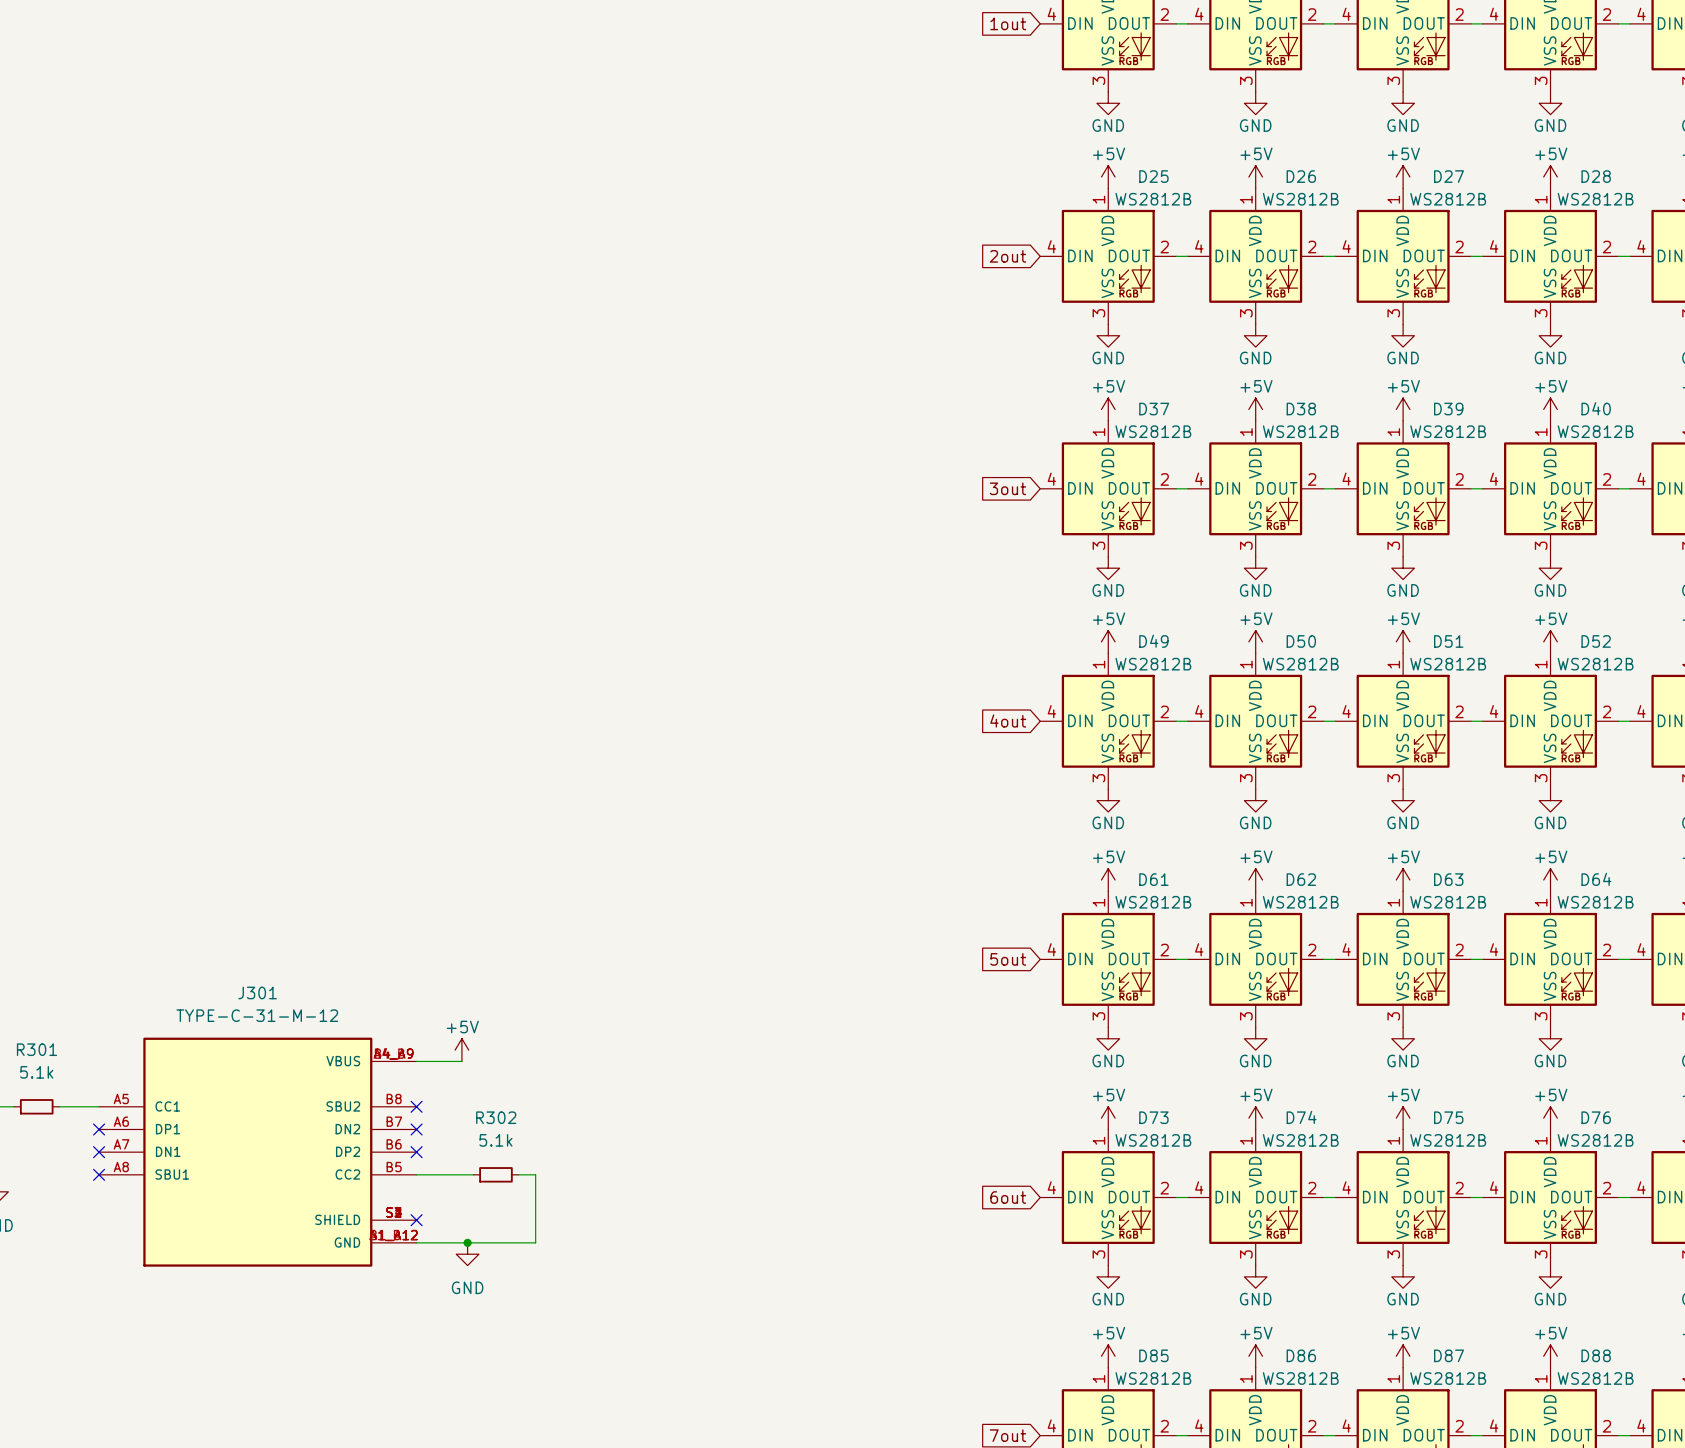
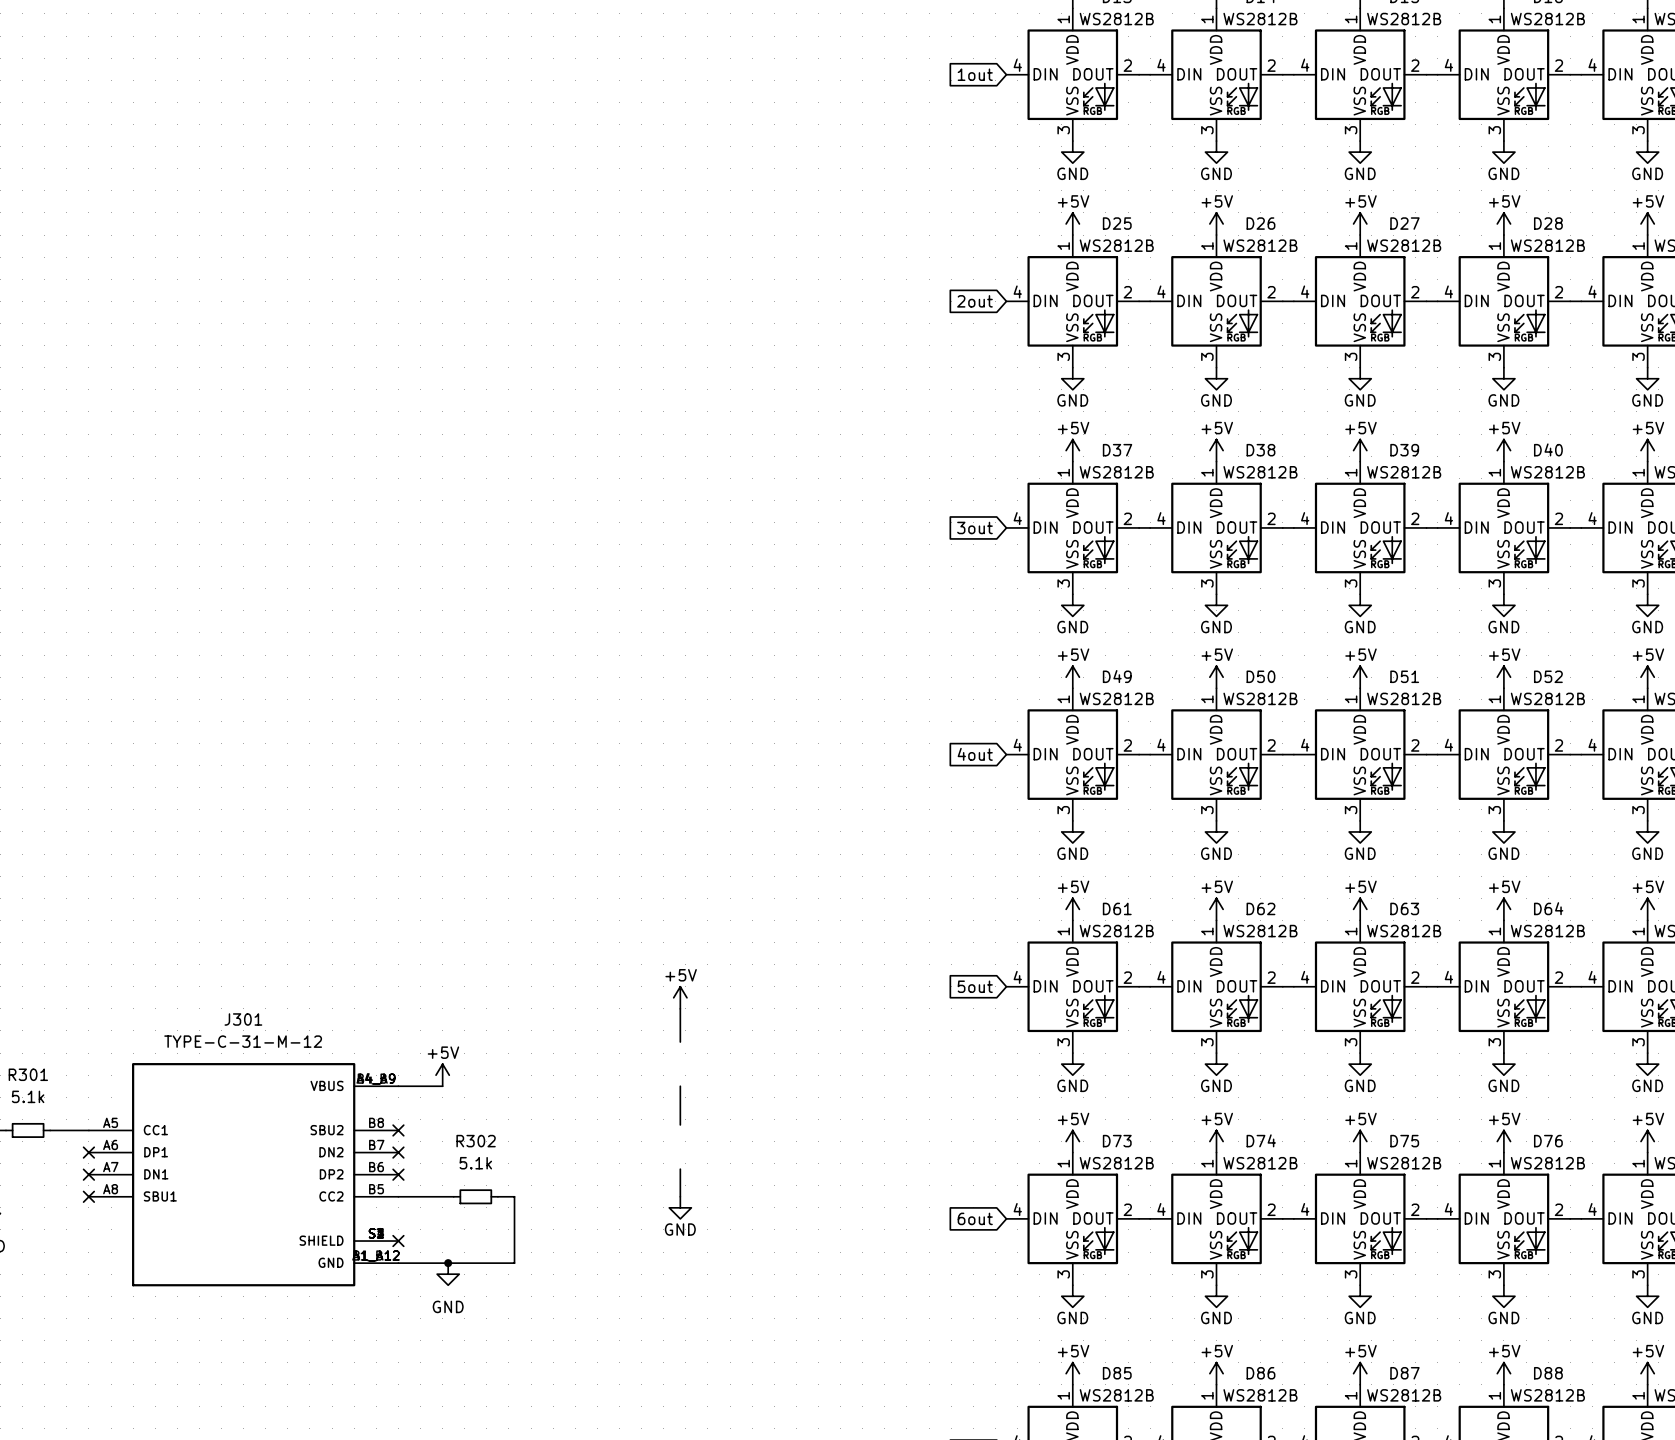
power symbol: none -> +5V (680, 997)
wire: none -> (680, 1008) (680, 1042)
wire: none -> (680, 1086) (680, 1124)
wire: none -> (680, 1169) (680, 1196)
power symbol: none -> GND (680, 1207)

